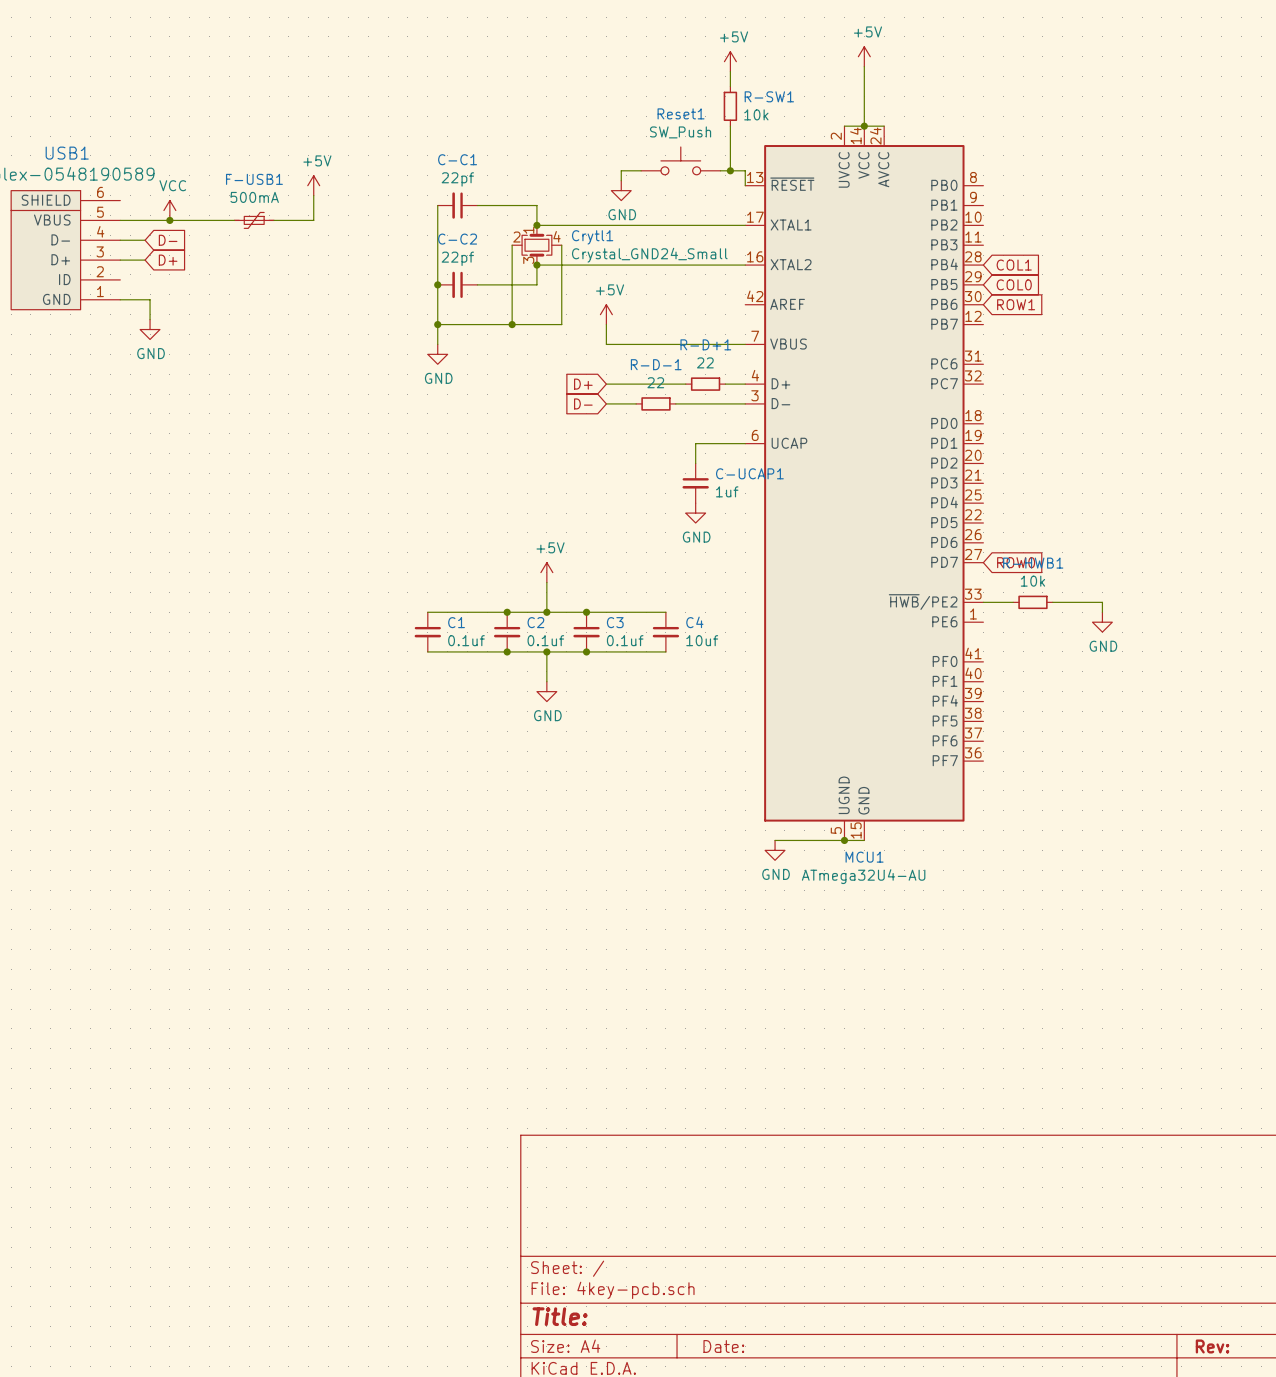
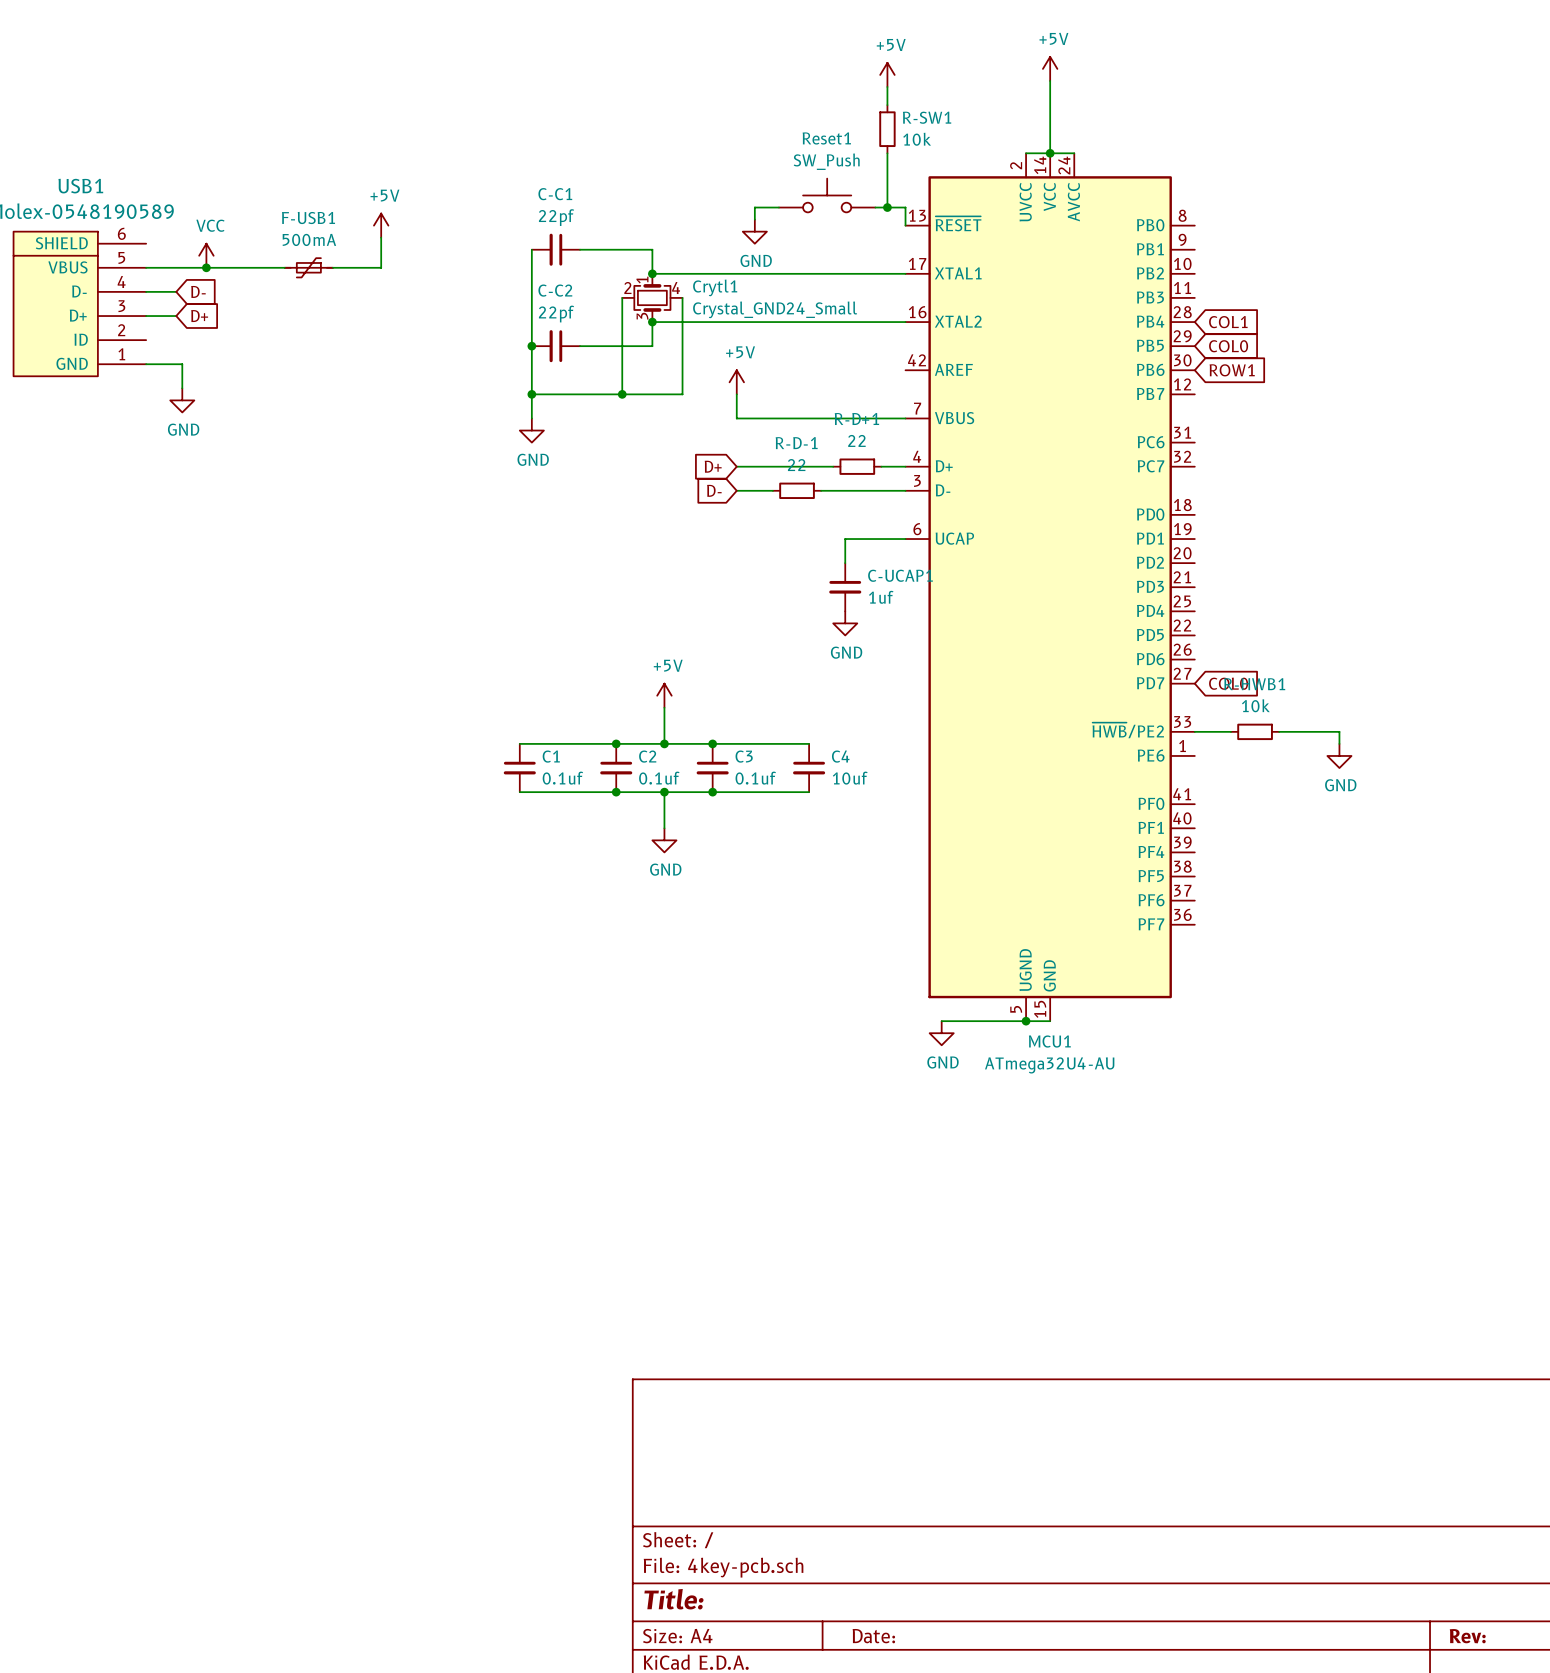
global label: ROW0 (1016, 562) -> COL0 (1228, 683)

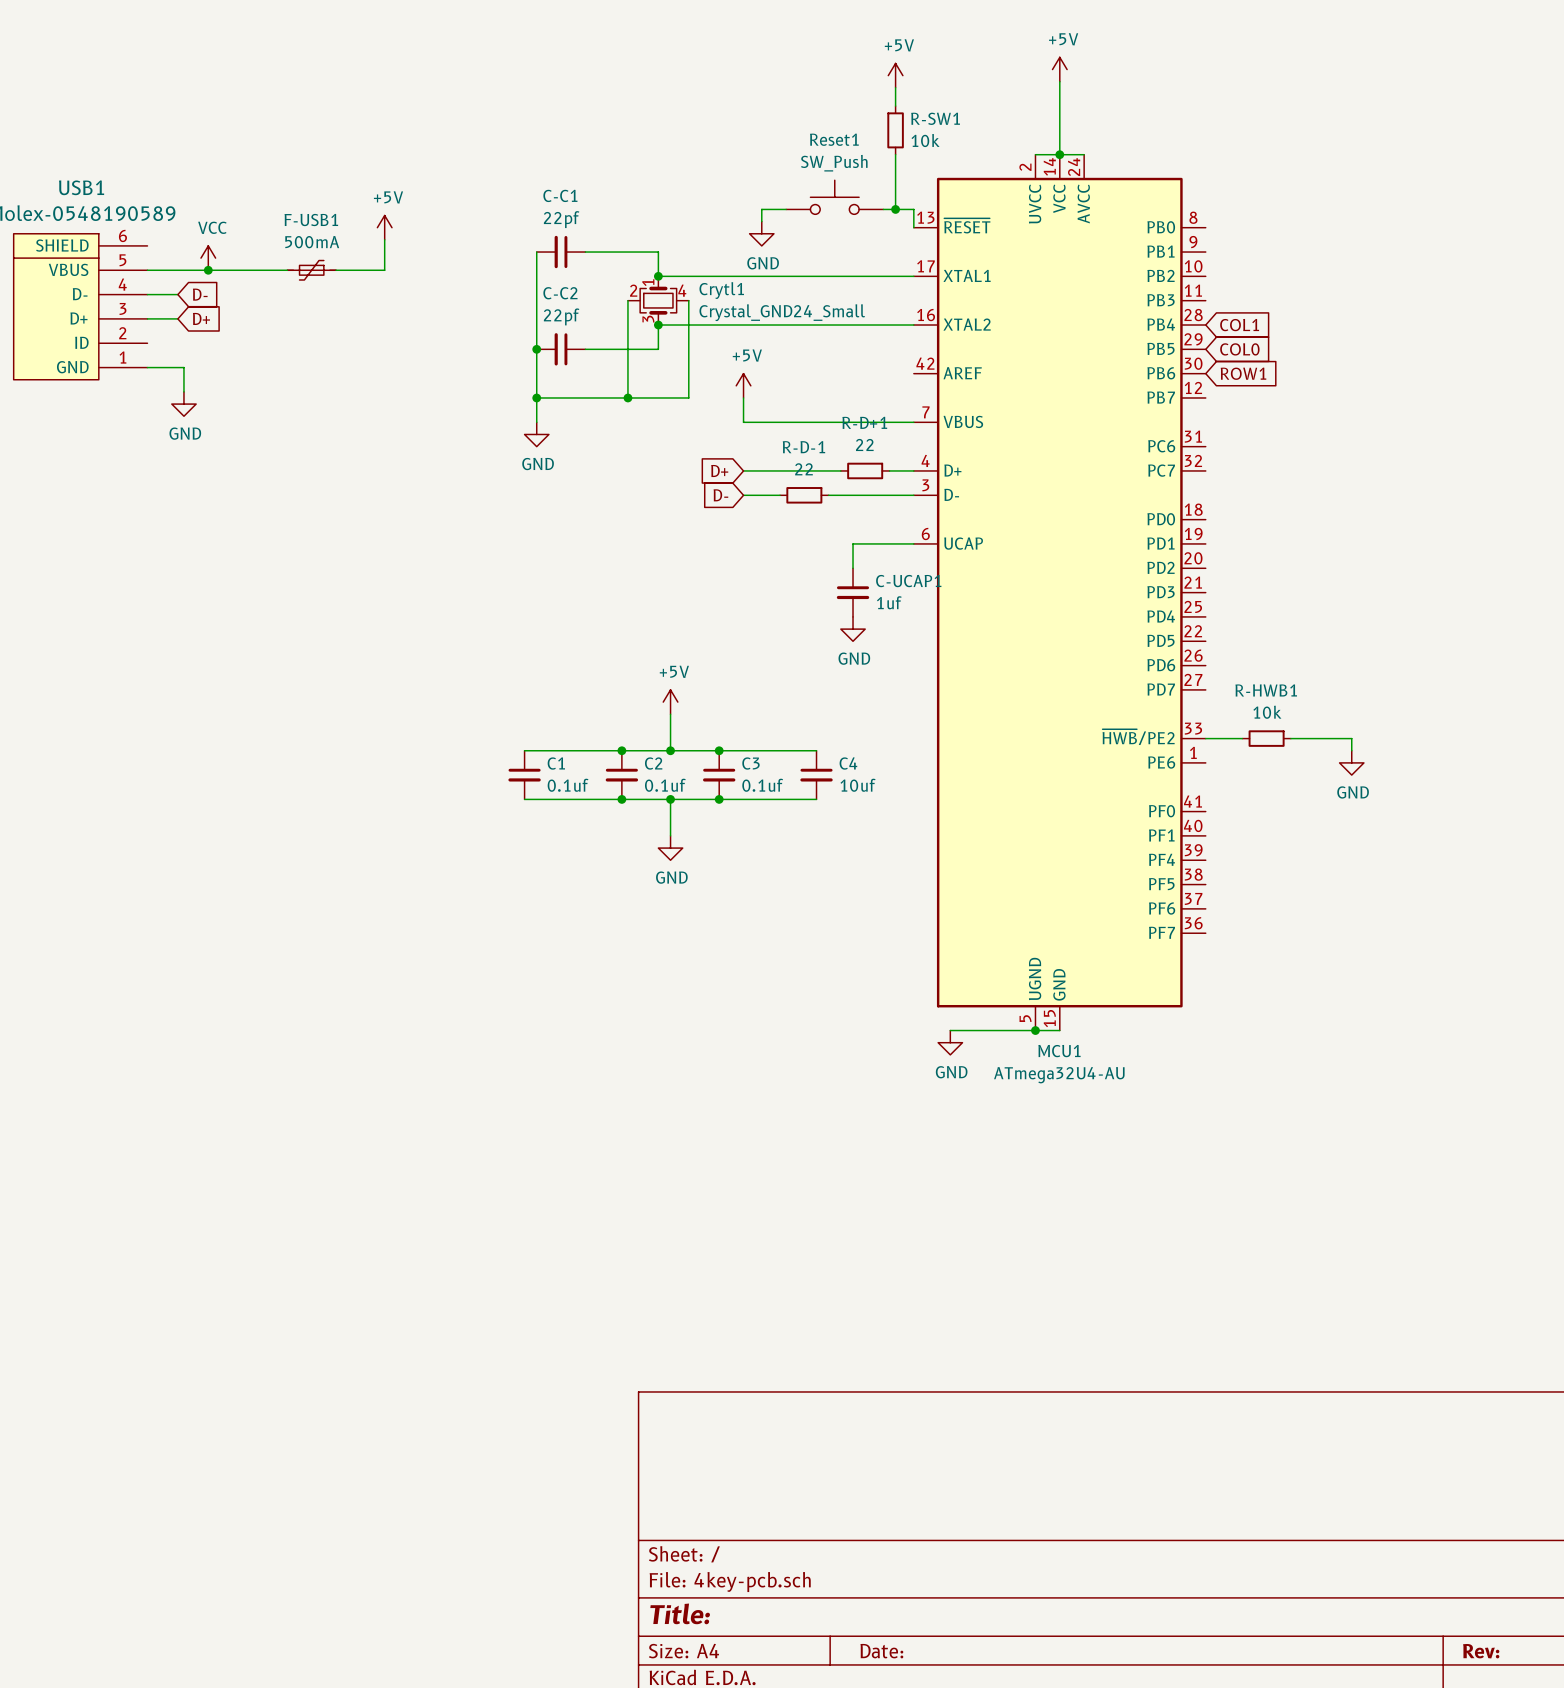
global label: COL0 (1228, 683) -> none

